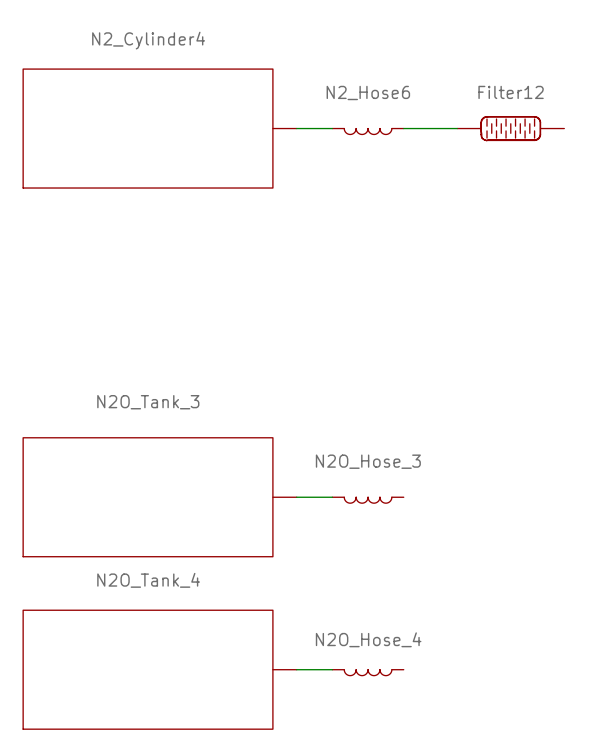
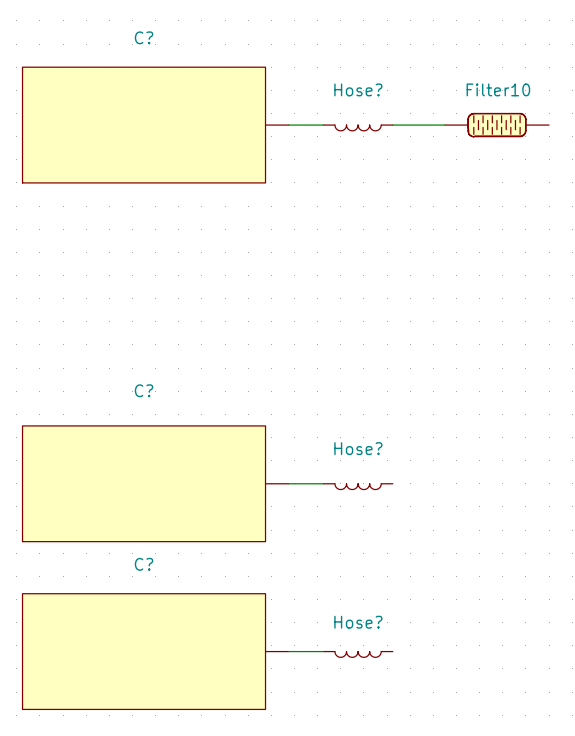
N2_Cylinder4 name: N2_Cylinder4 (148, 40) -> C? (144, 37)
N2_Hose6 name: N2_Hose6 (368, 92) -> Hose? (358, 89)
Filter12 name: Filter12 (511, 92) -> Filter10 (498, 89)
N2O_Tank_3 name: N2O_Tank_3 (148, 402) -> C? (144, 390)
N2O_Hose_3 name: N2O_Hose_3 (368, 461) -> Hose? (358, 448)
N2O_Tank_4 name: N2O_Tank_4 (148, 580) -> C? (144, 564)
N2O_Hose_4 name: N2O_Hose_4 (368, 639) -> Hose? (358, 622)

